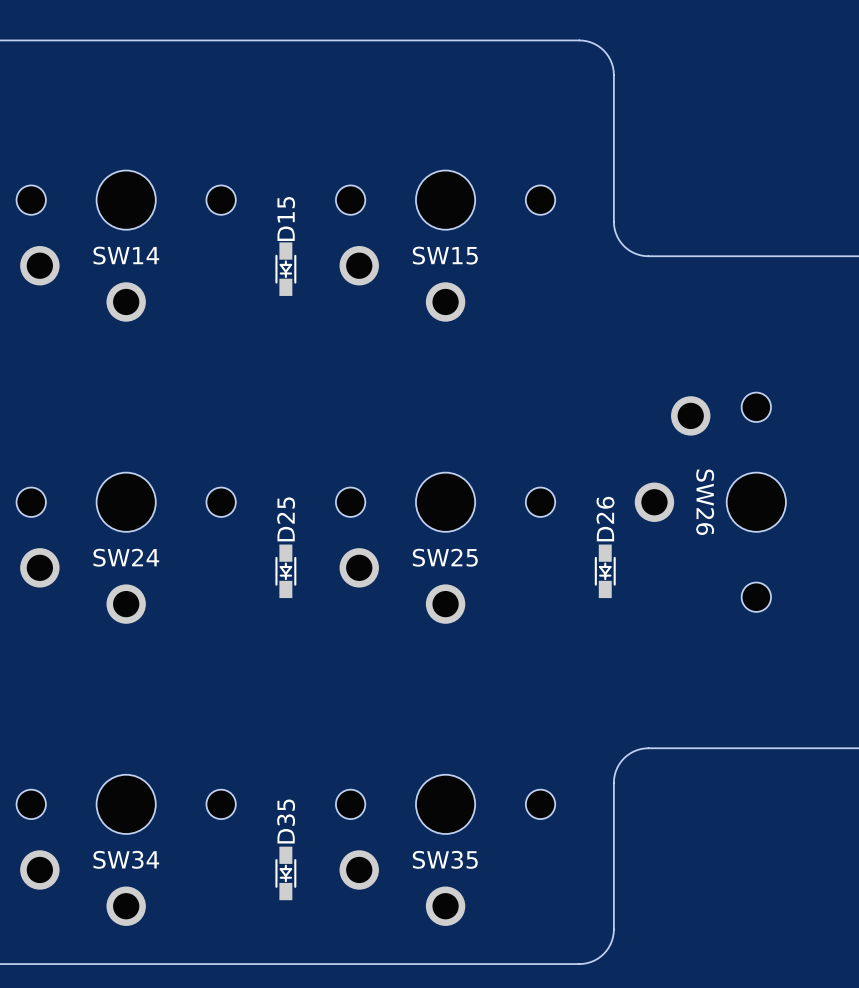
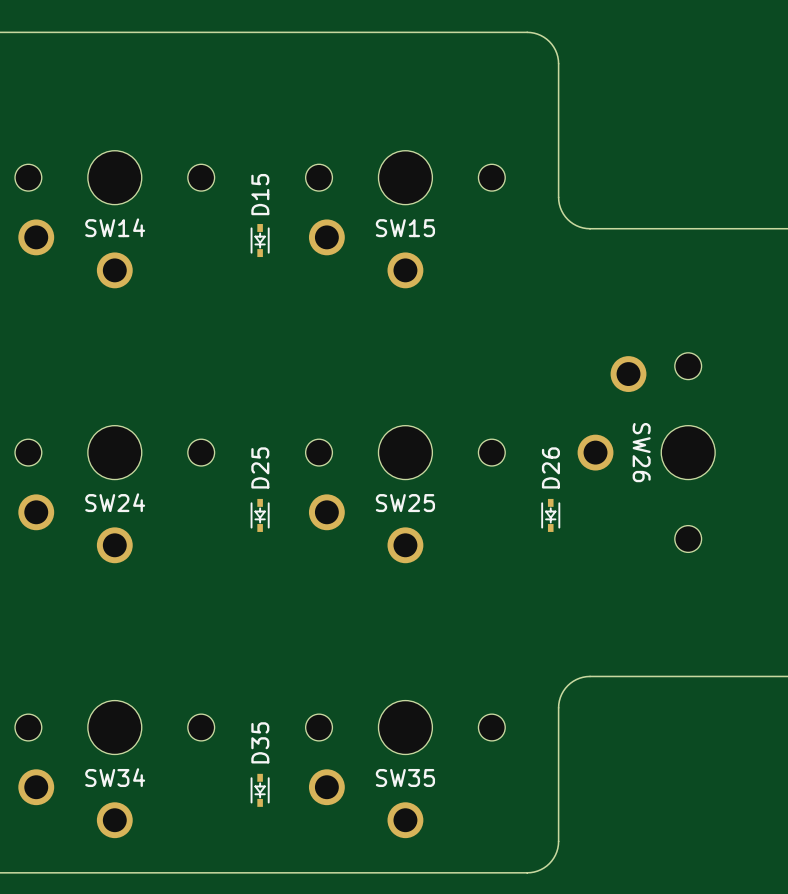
D15 footprint: [275, 242, 297, 296] -> [250, 224, 270, 258]
D25 footprint: [275, 544, 297, 599] -> [250, 498, 270, 532]
D26 footprint: [594, 544, 616, 599] -> [541, 498, 561, 532]
D35 footprint: [275, 846, 297, 901] -> [250, 773, 270, 807]

